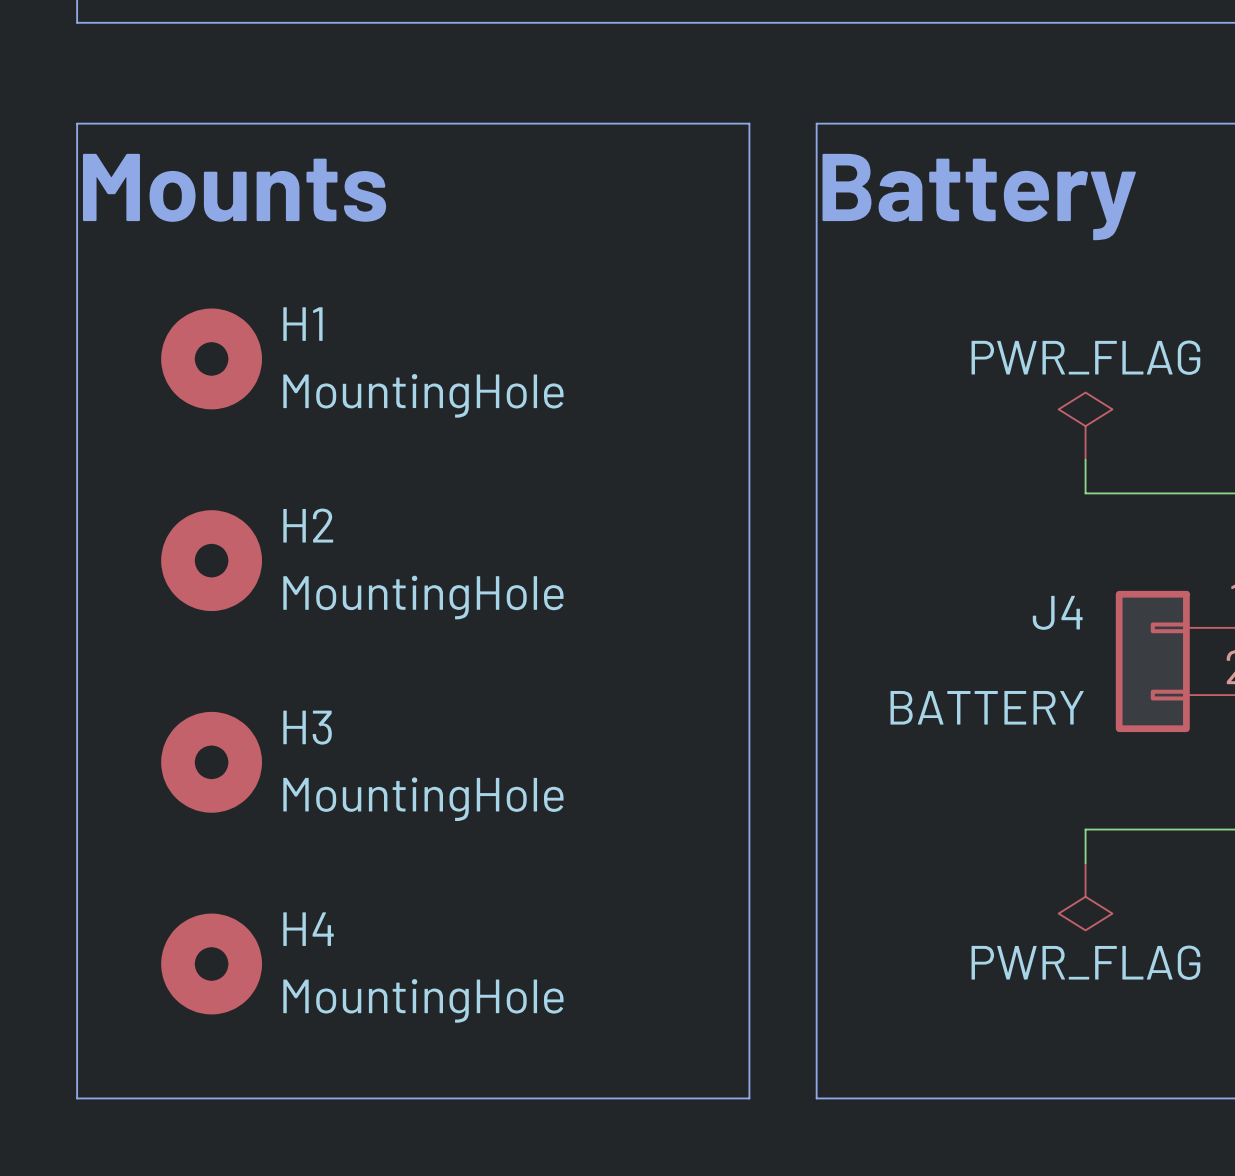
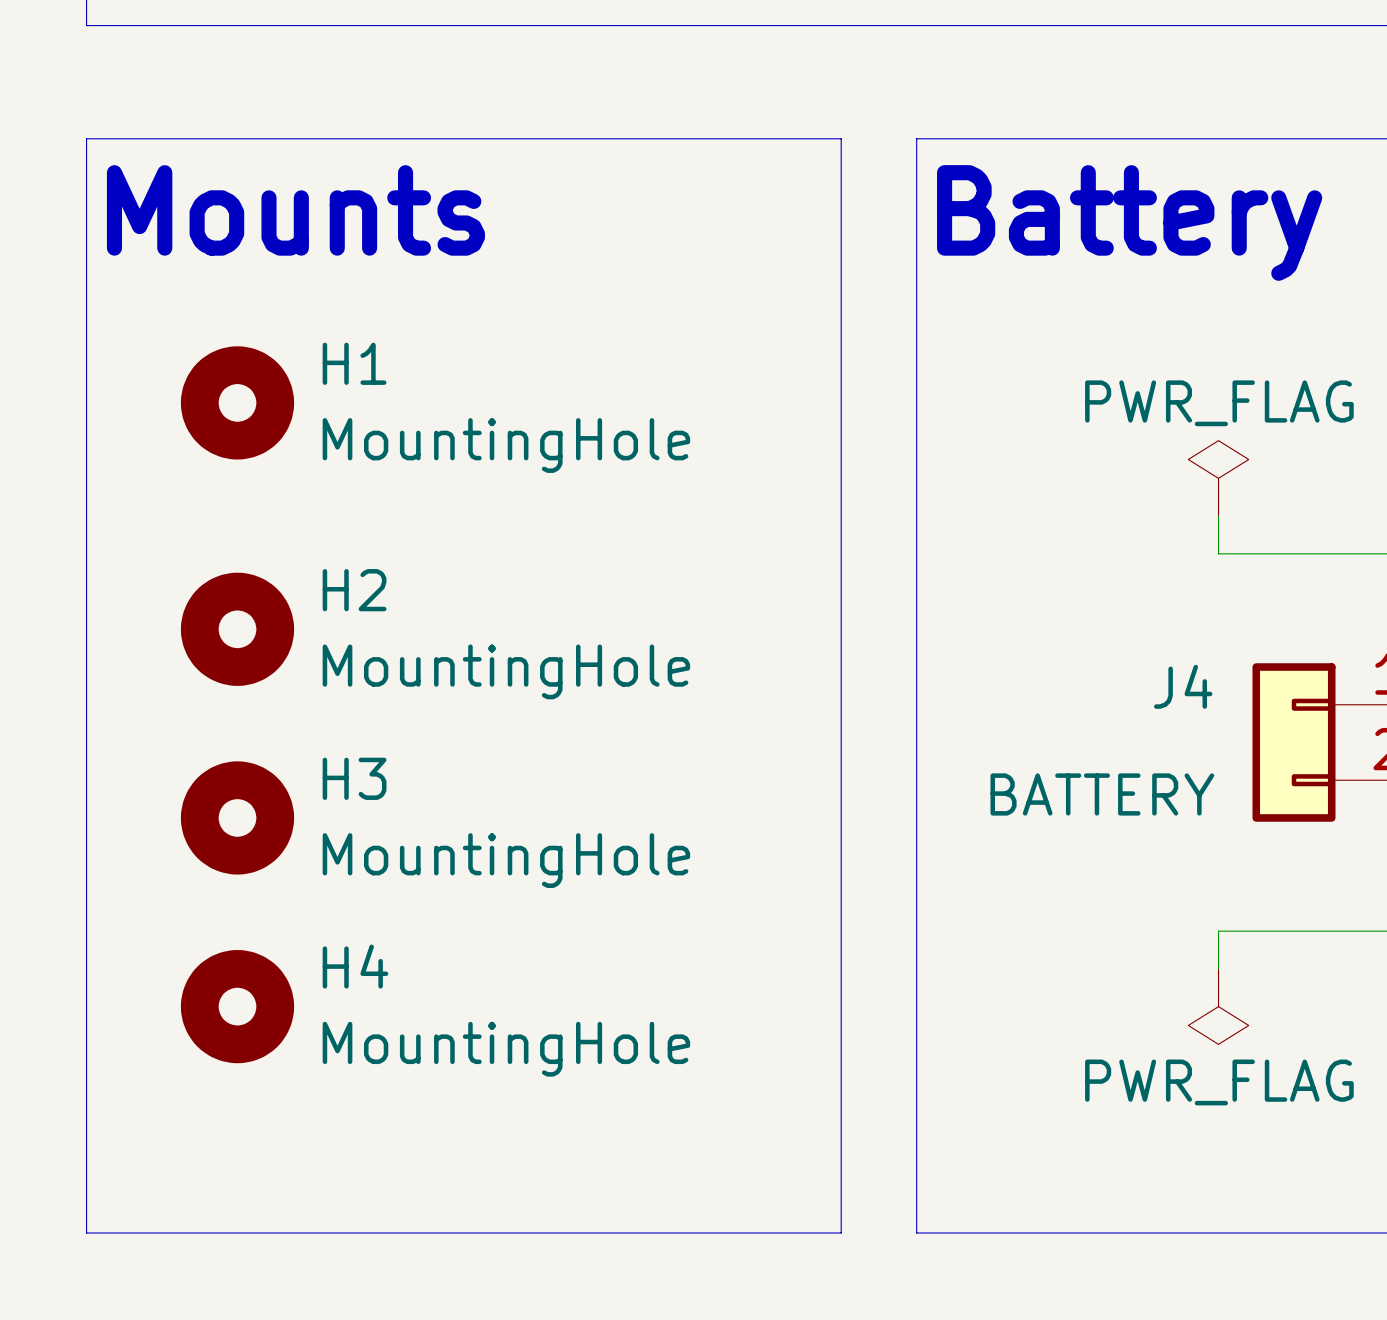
H3 position: (211, 762) -> (237, 817)
H4 position: (211, 964) -> (237, 1006)

